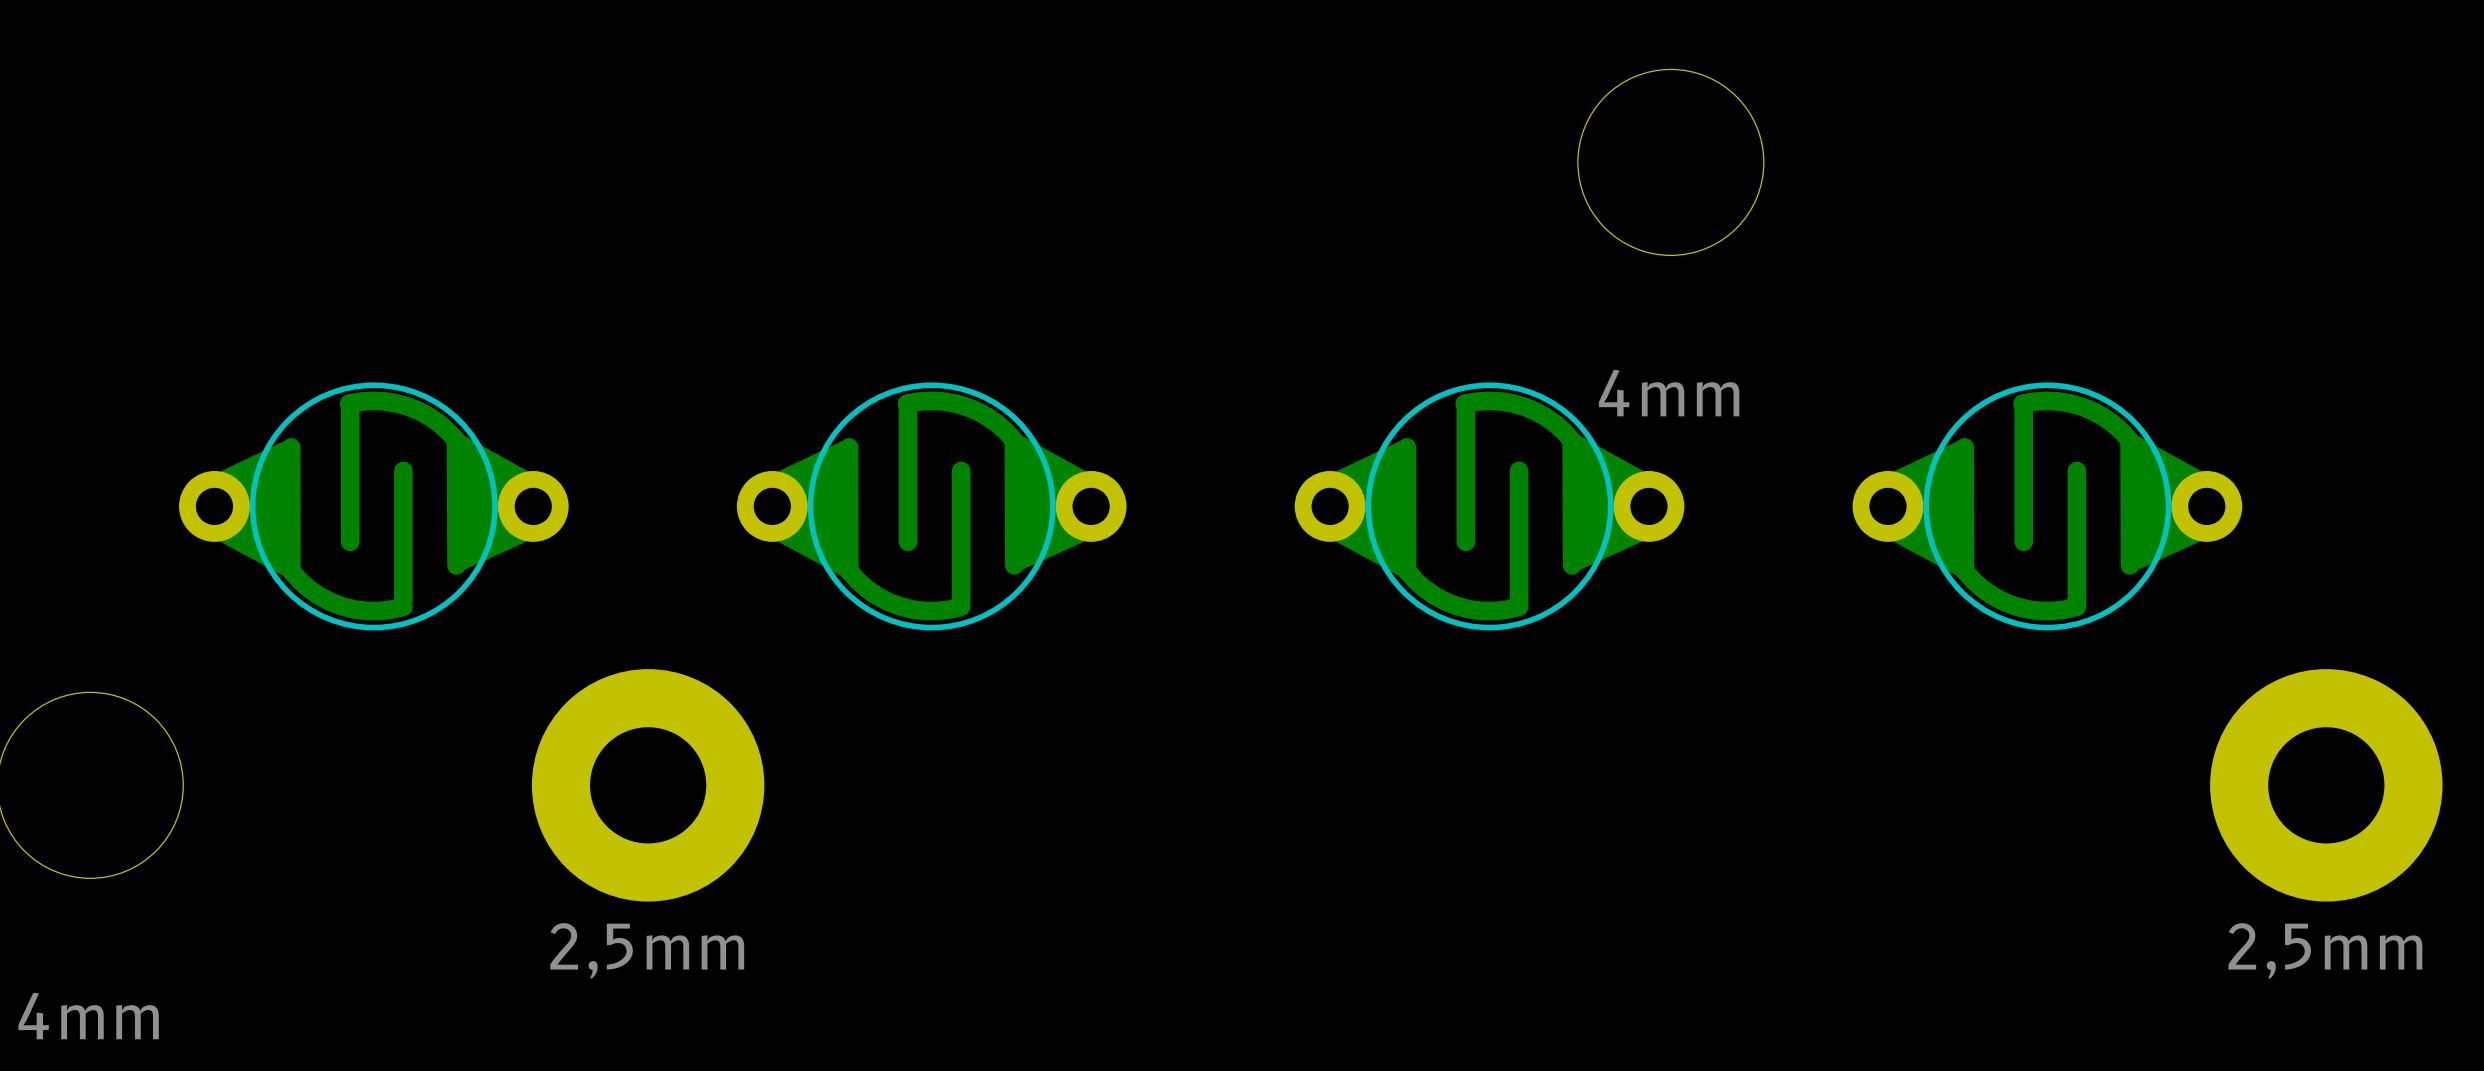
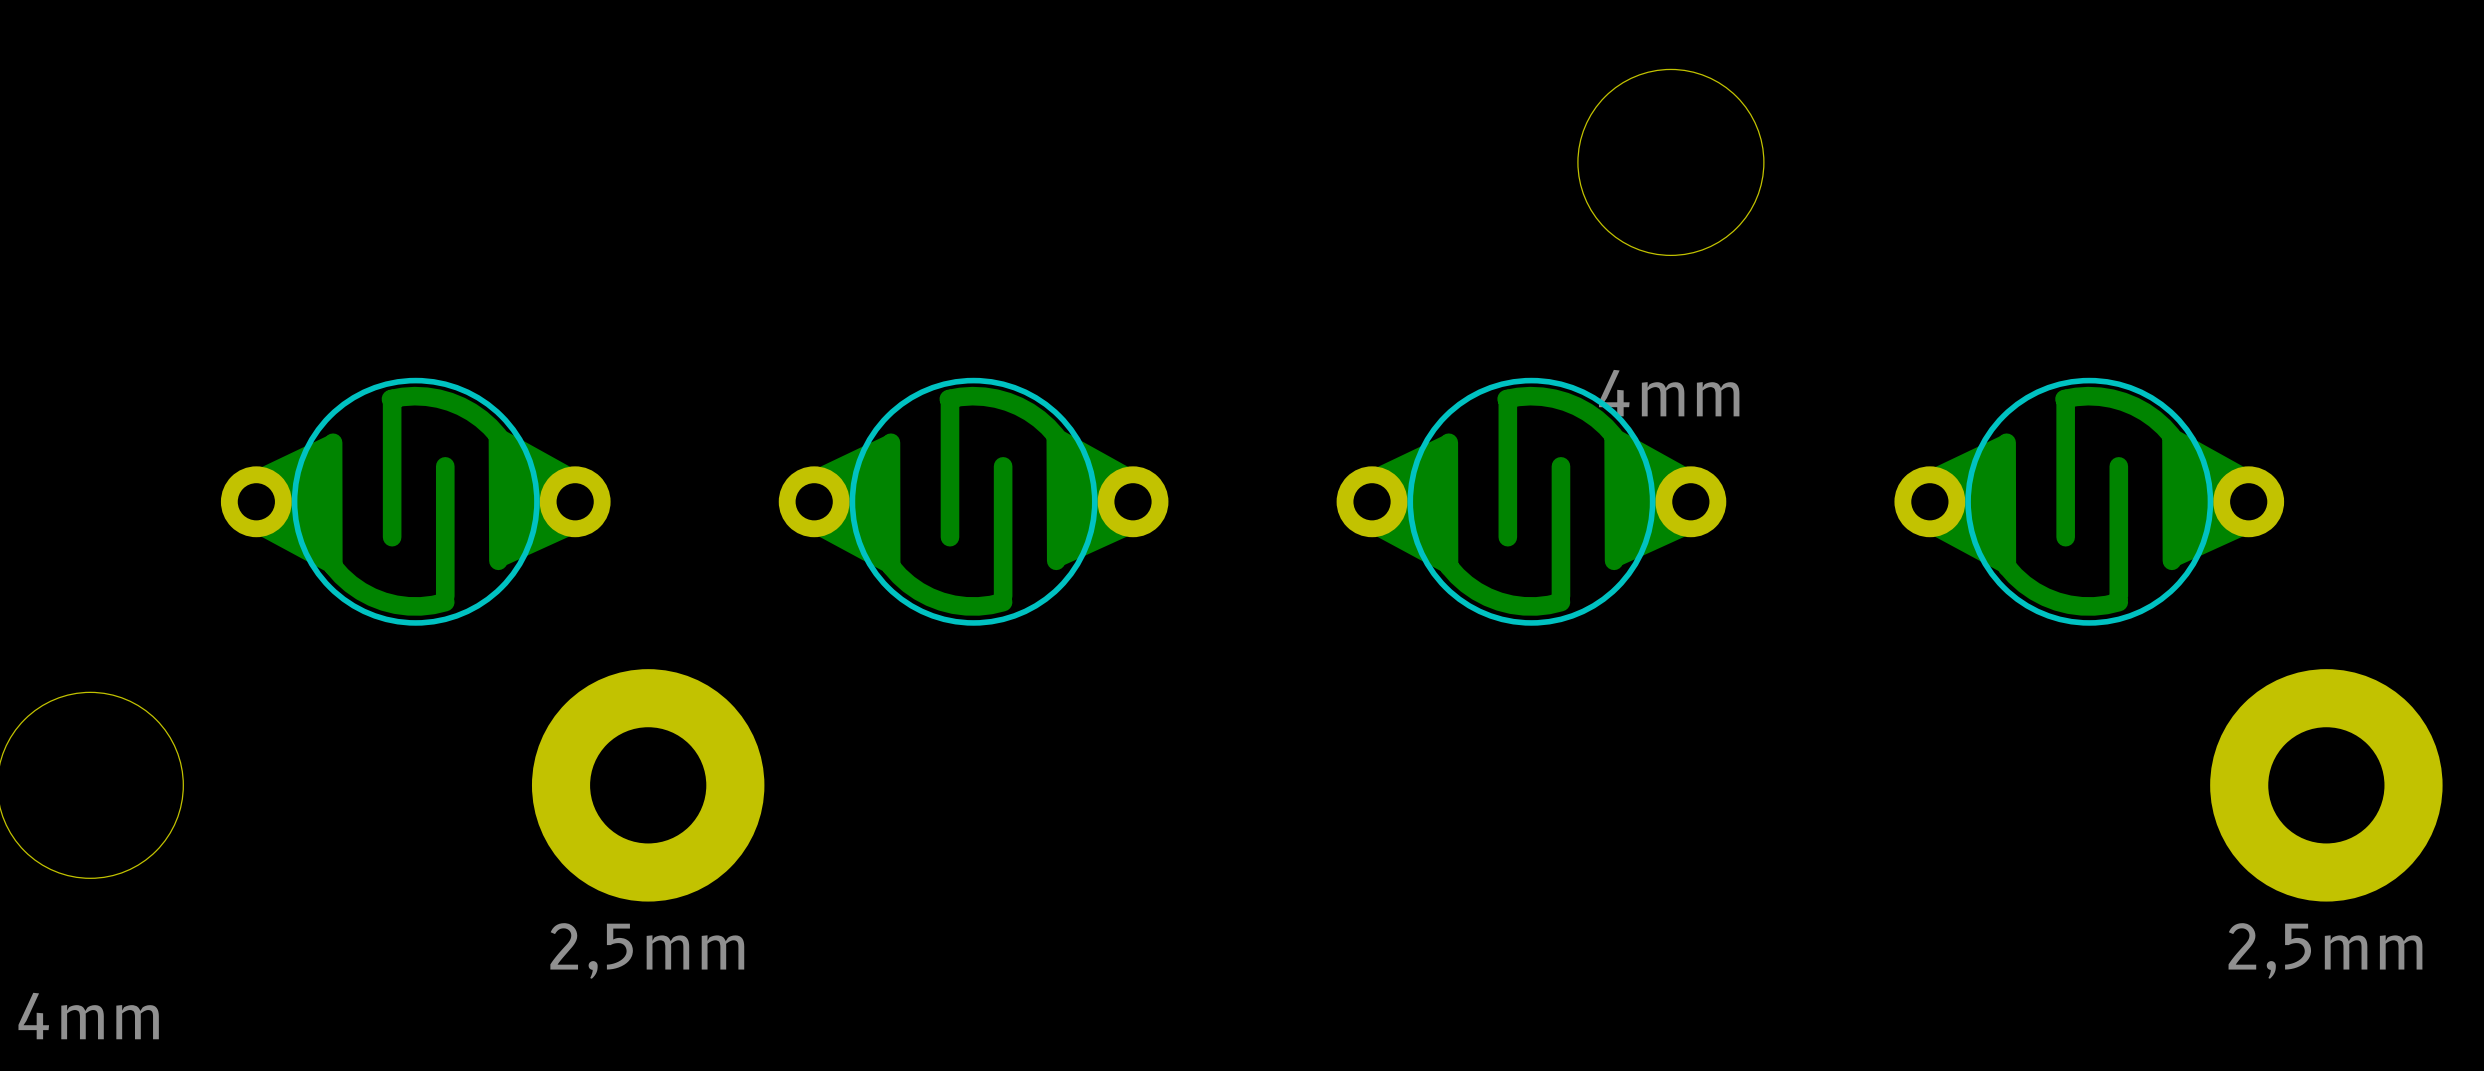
part position: (373, 506) -> (415, 501)
part position: (931, 506) -> (973, 501)
part position: (1489, 506) -> (1531, 501)
part position: (2047, 506) -> (2089, 501)

